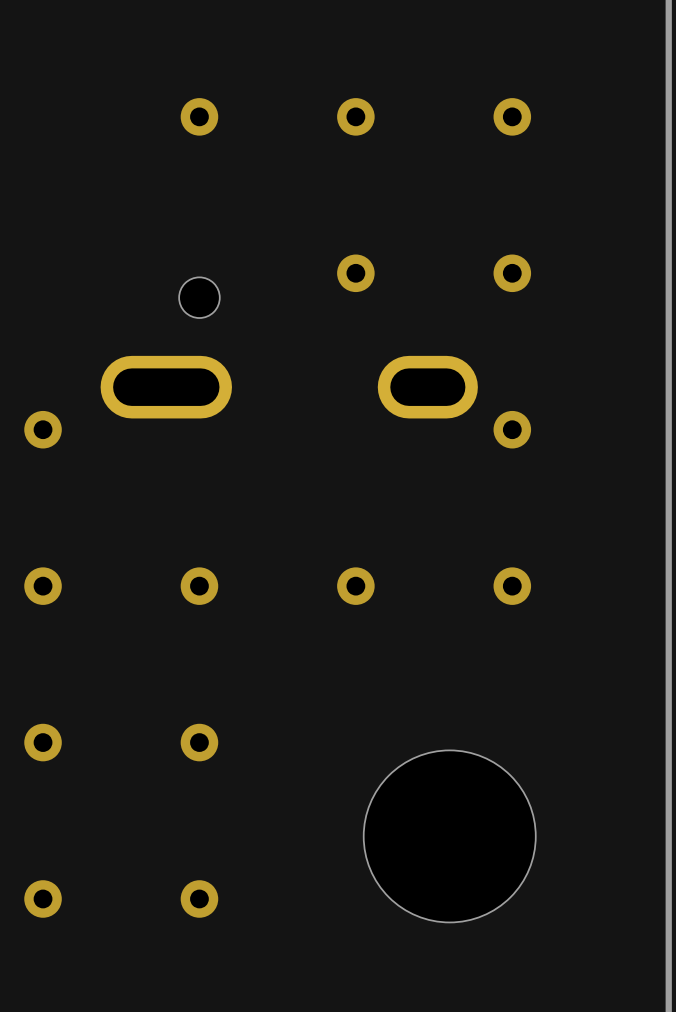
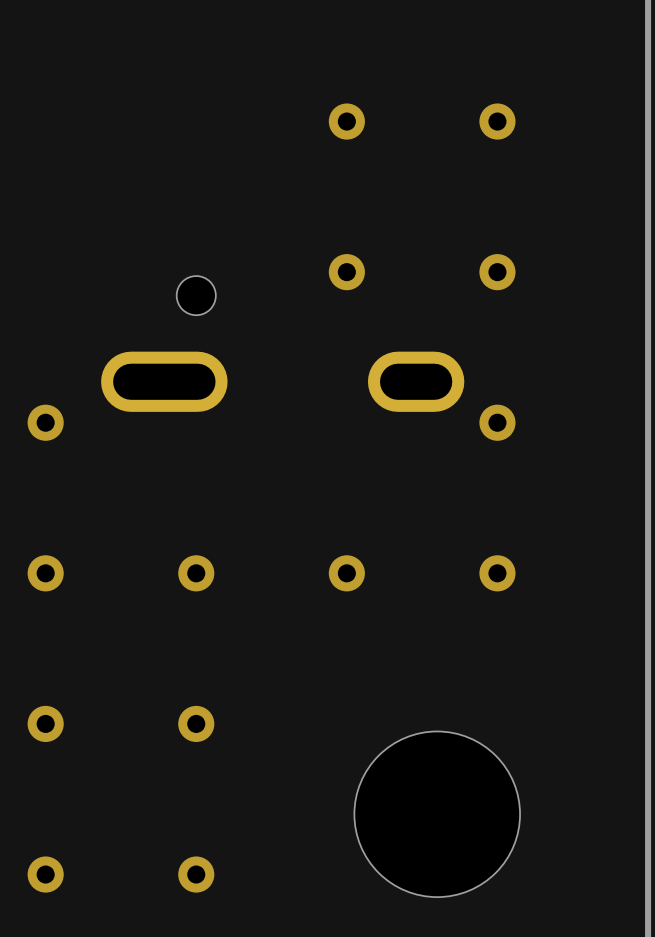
via: (199, 116) -> none

